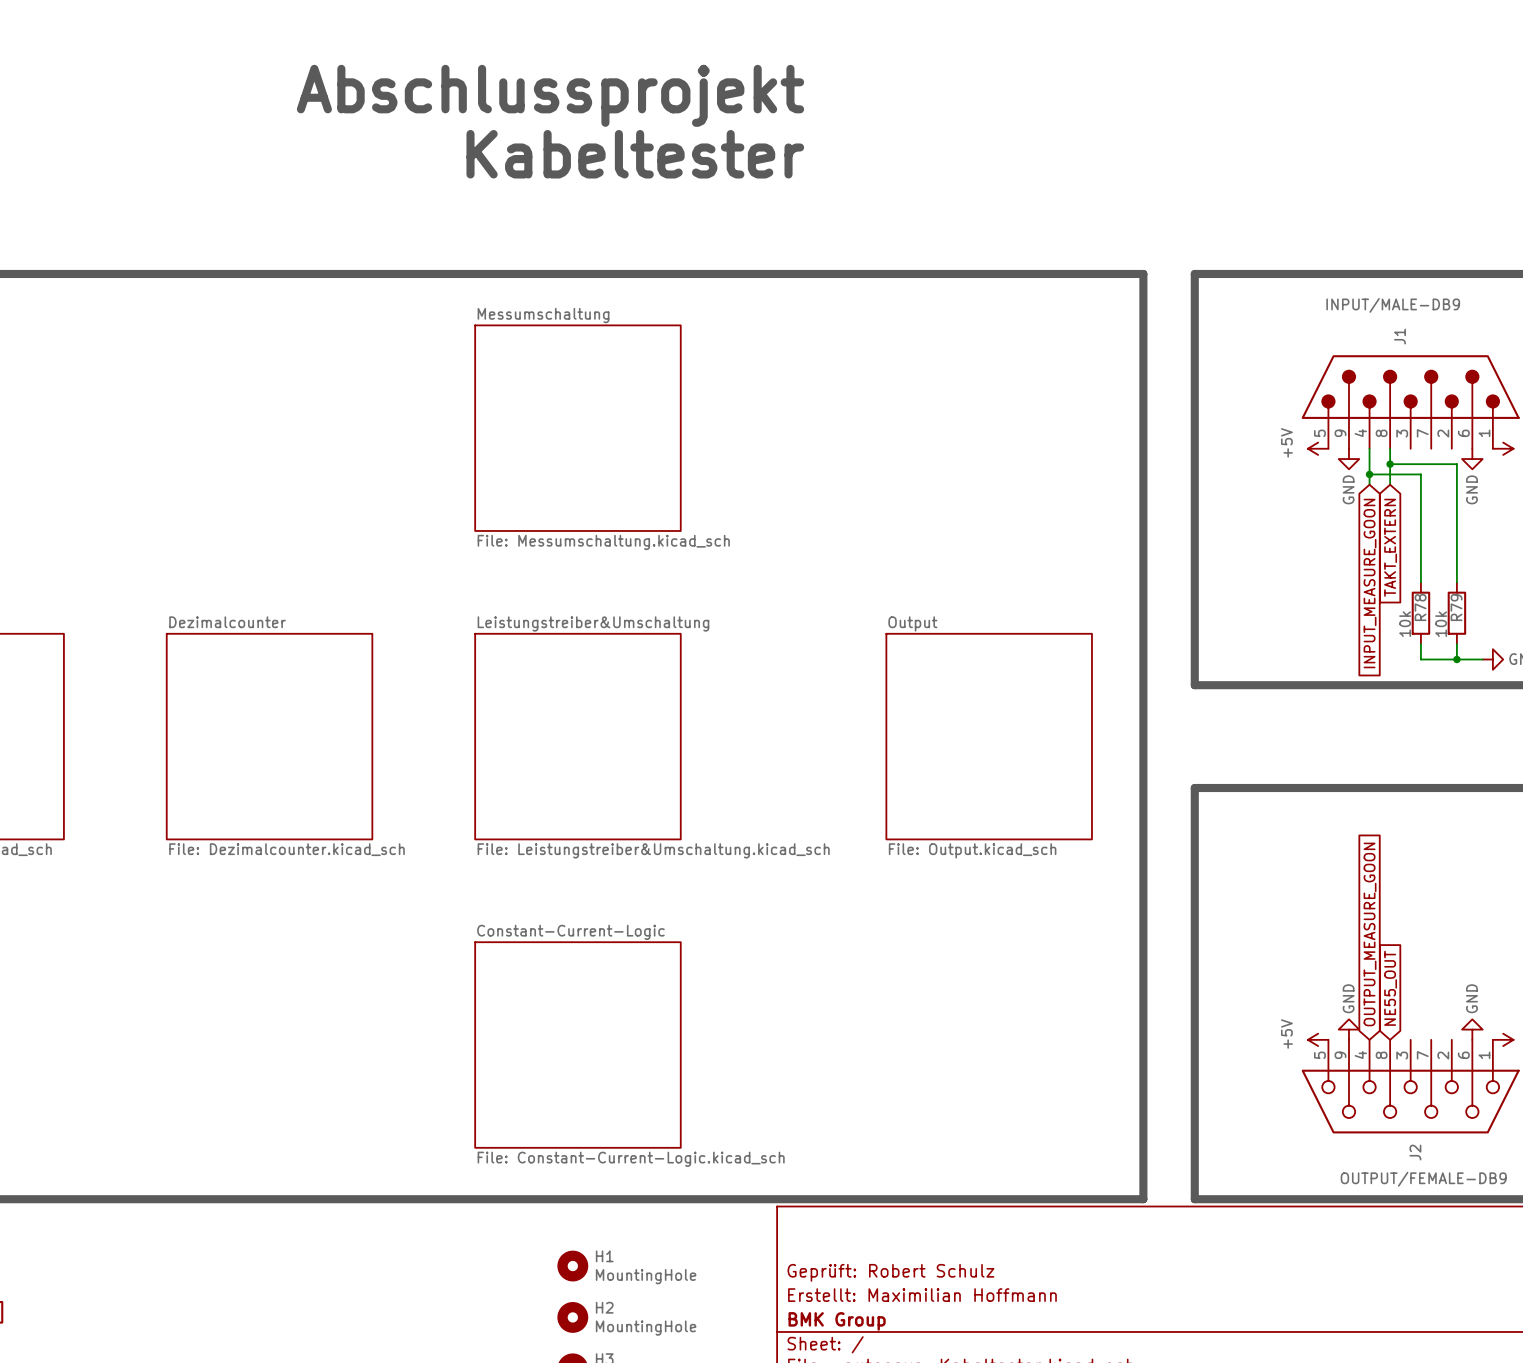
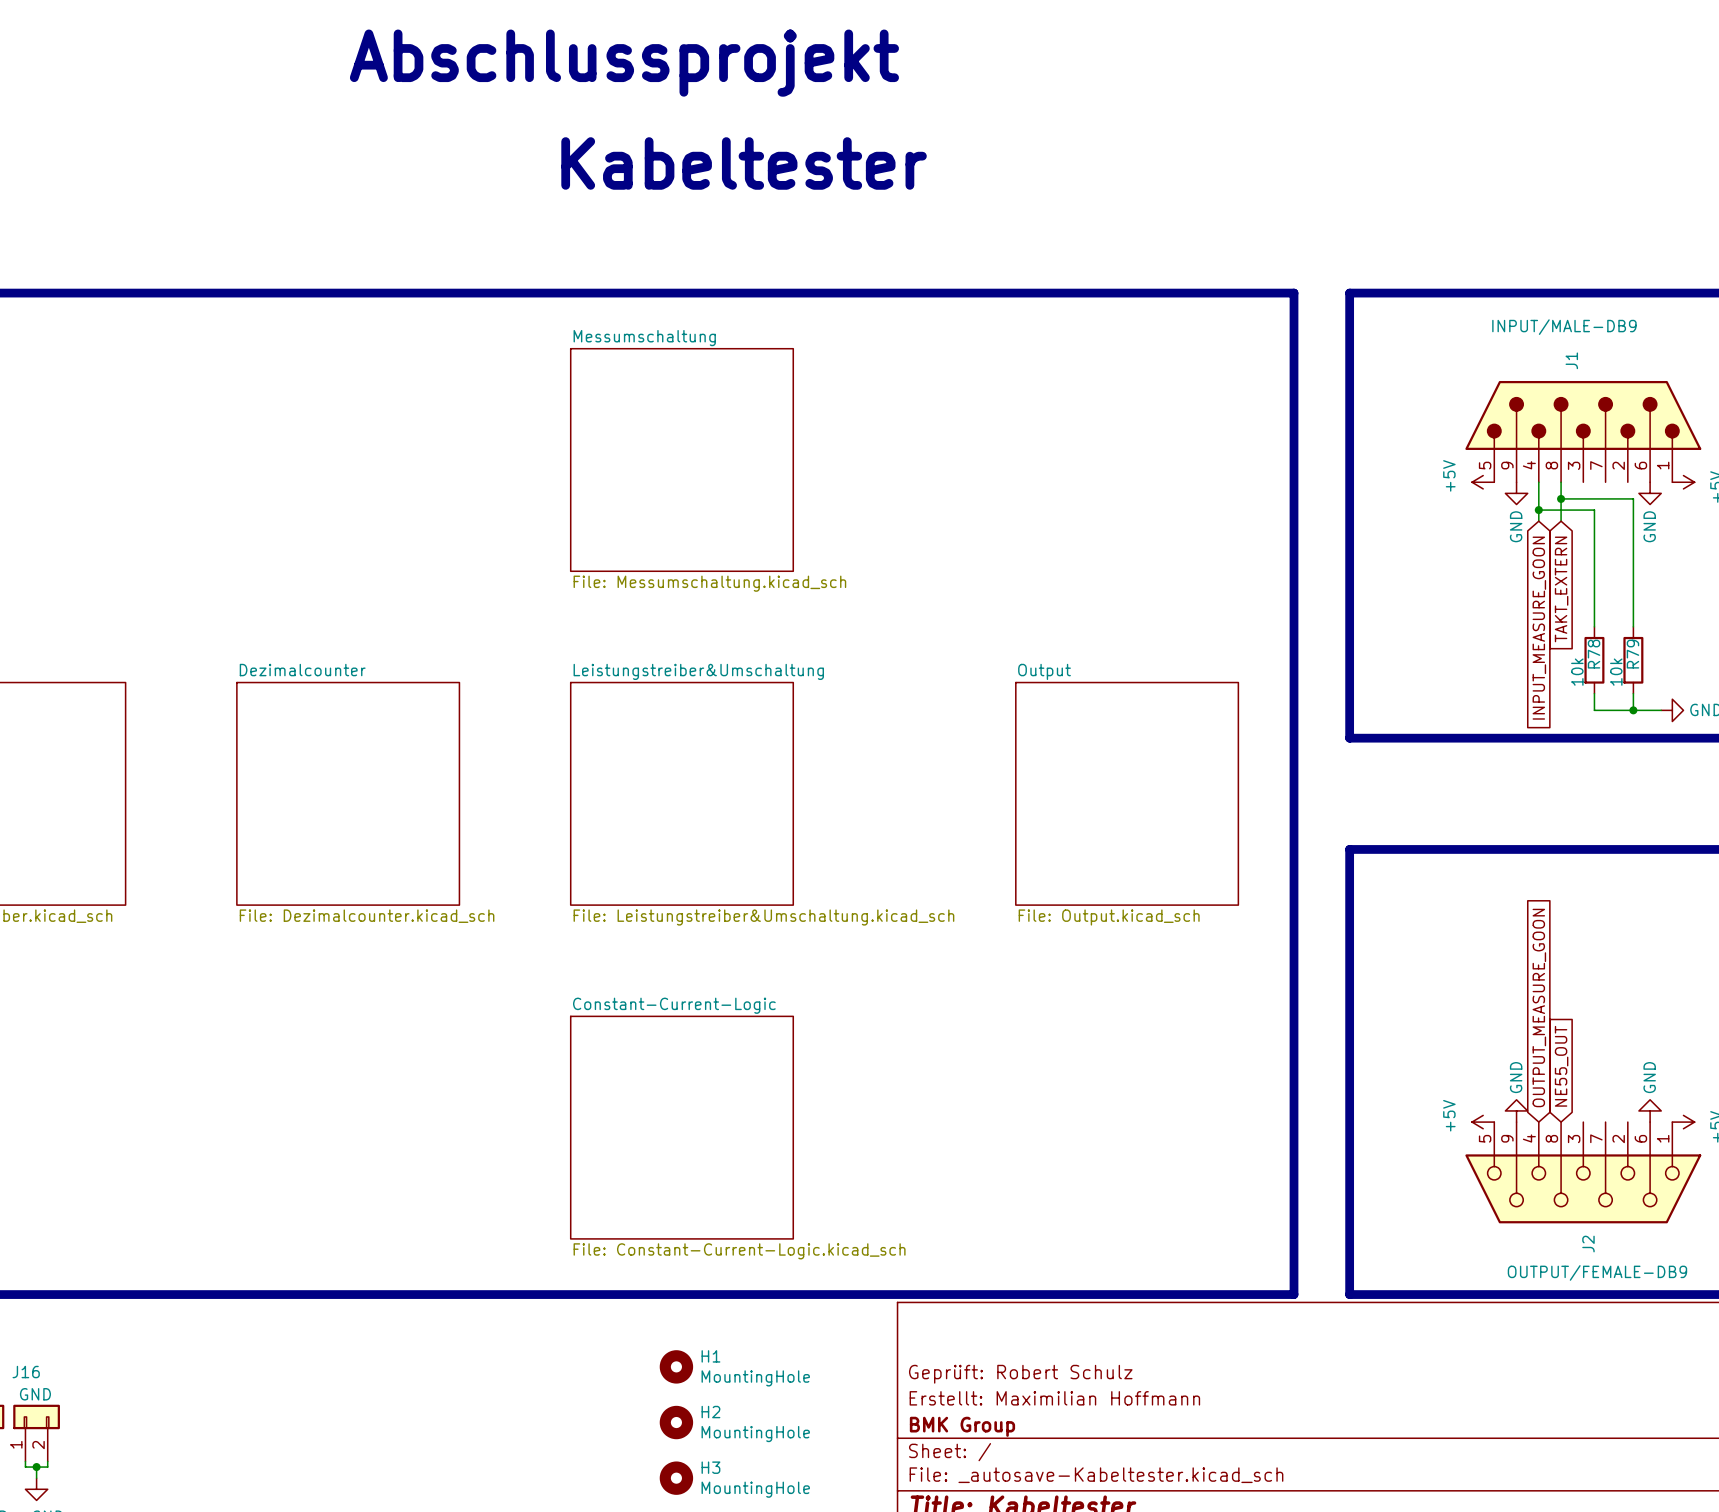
text position: Abschlussprojekt (550, 95) -> Abschlussprojekt (624, 63)

